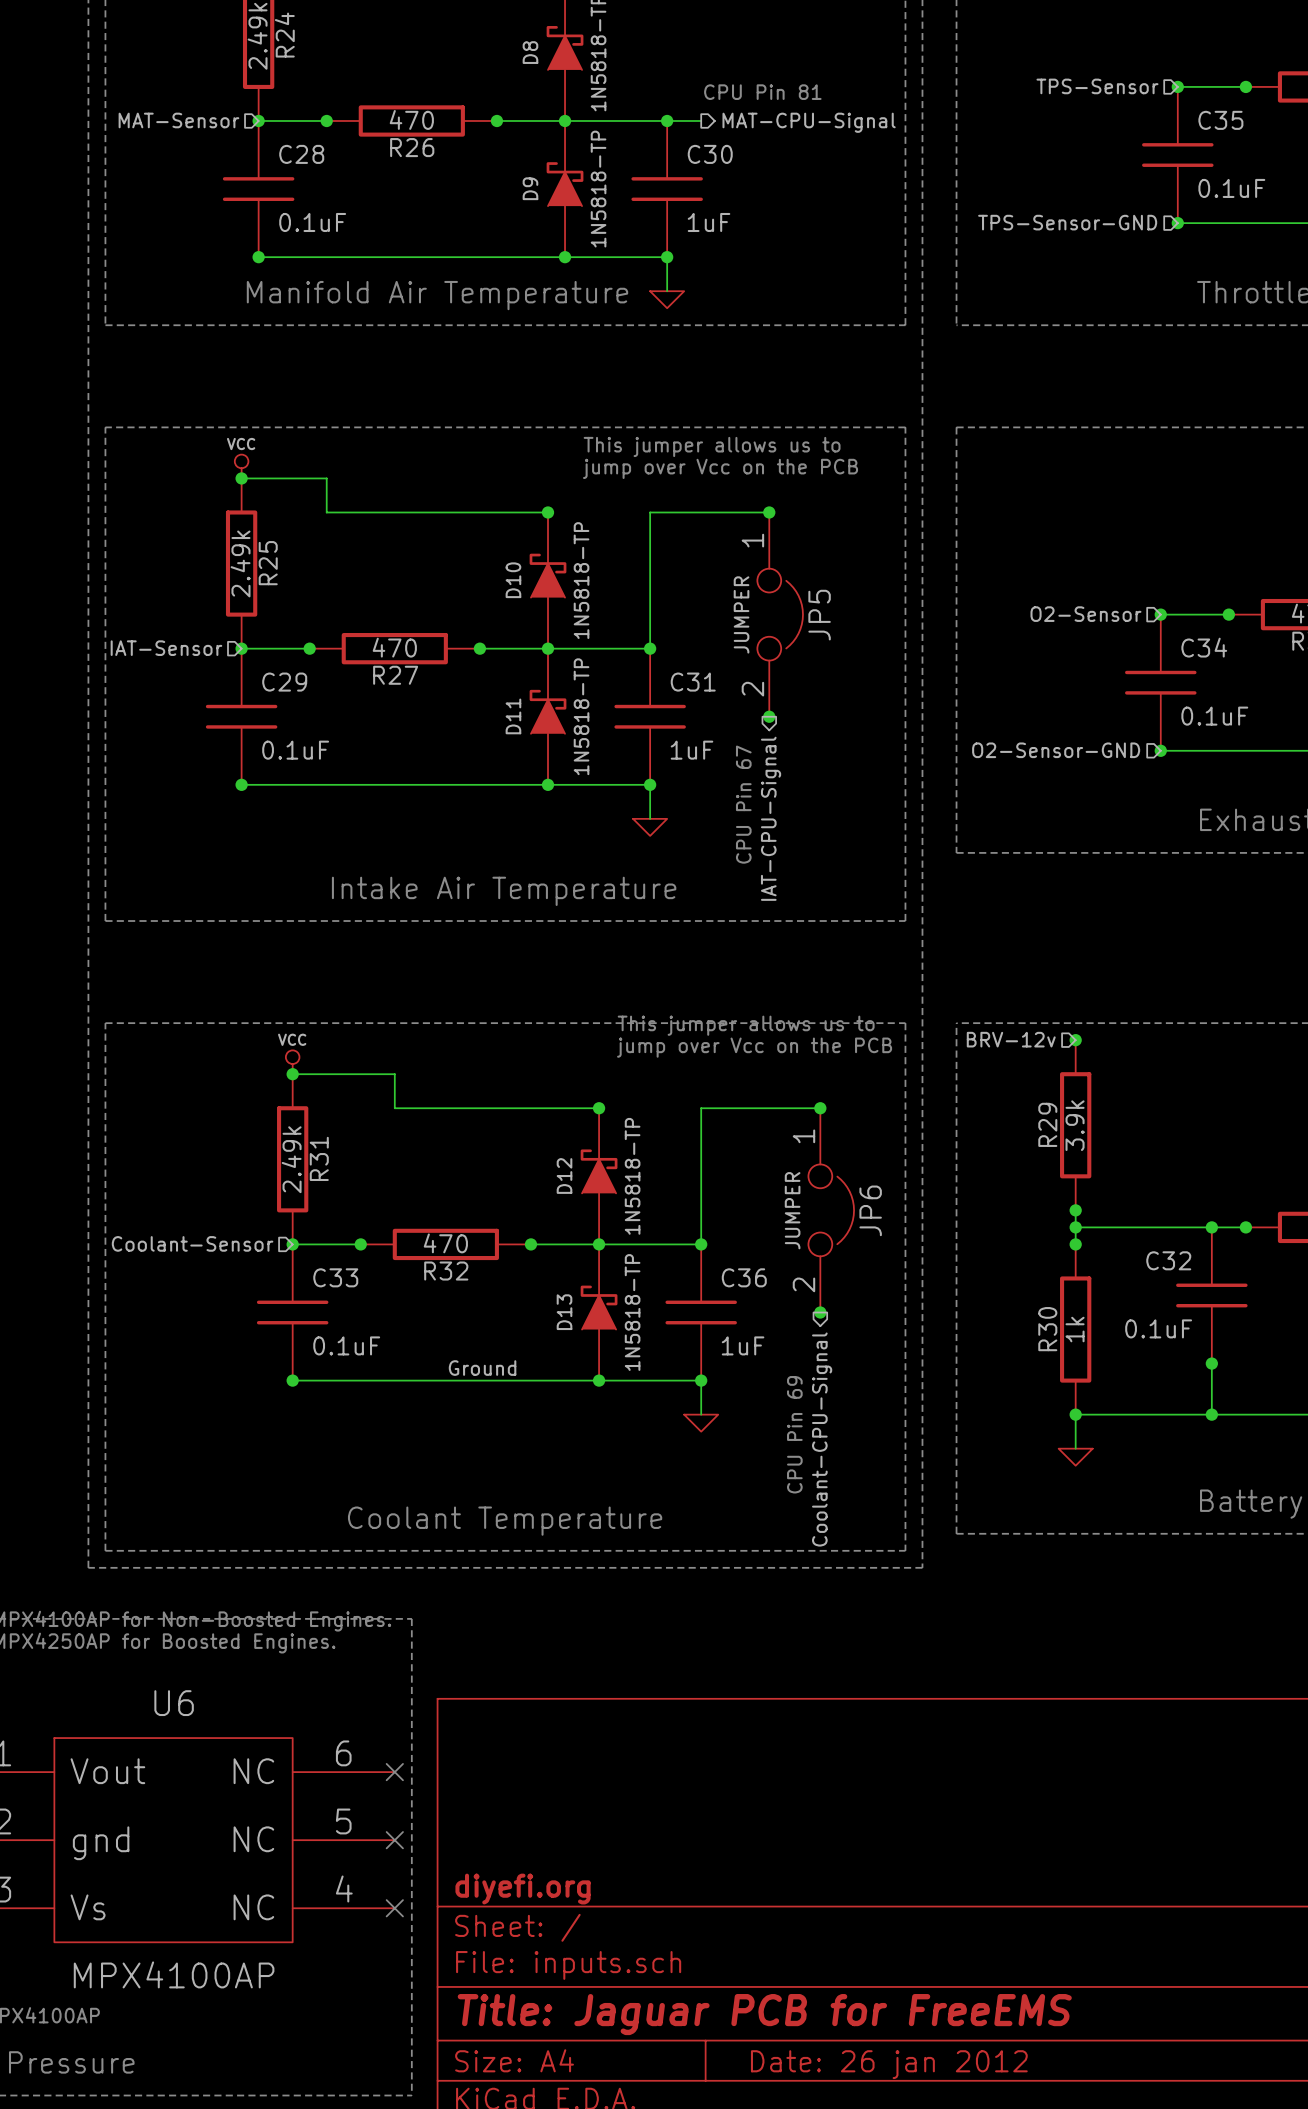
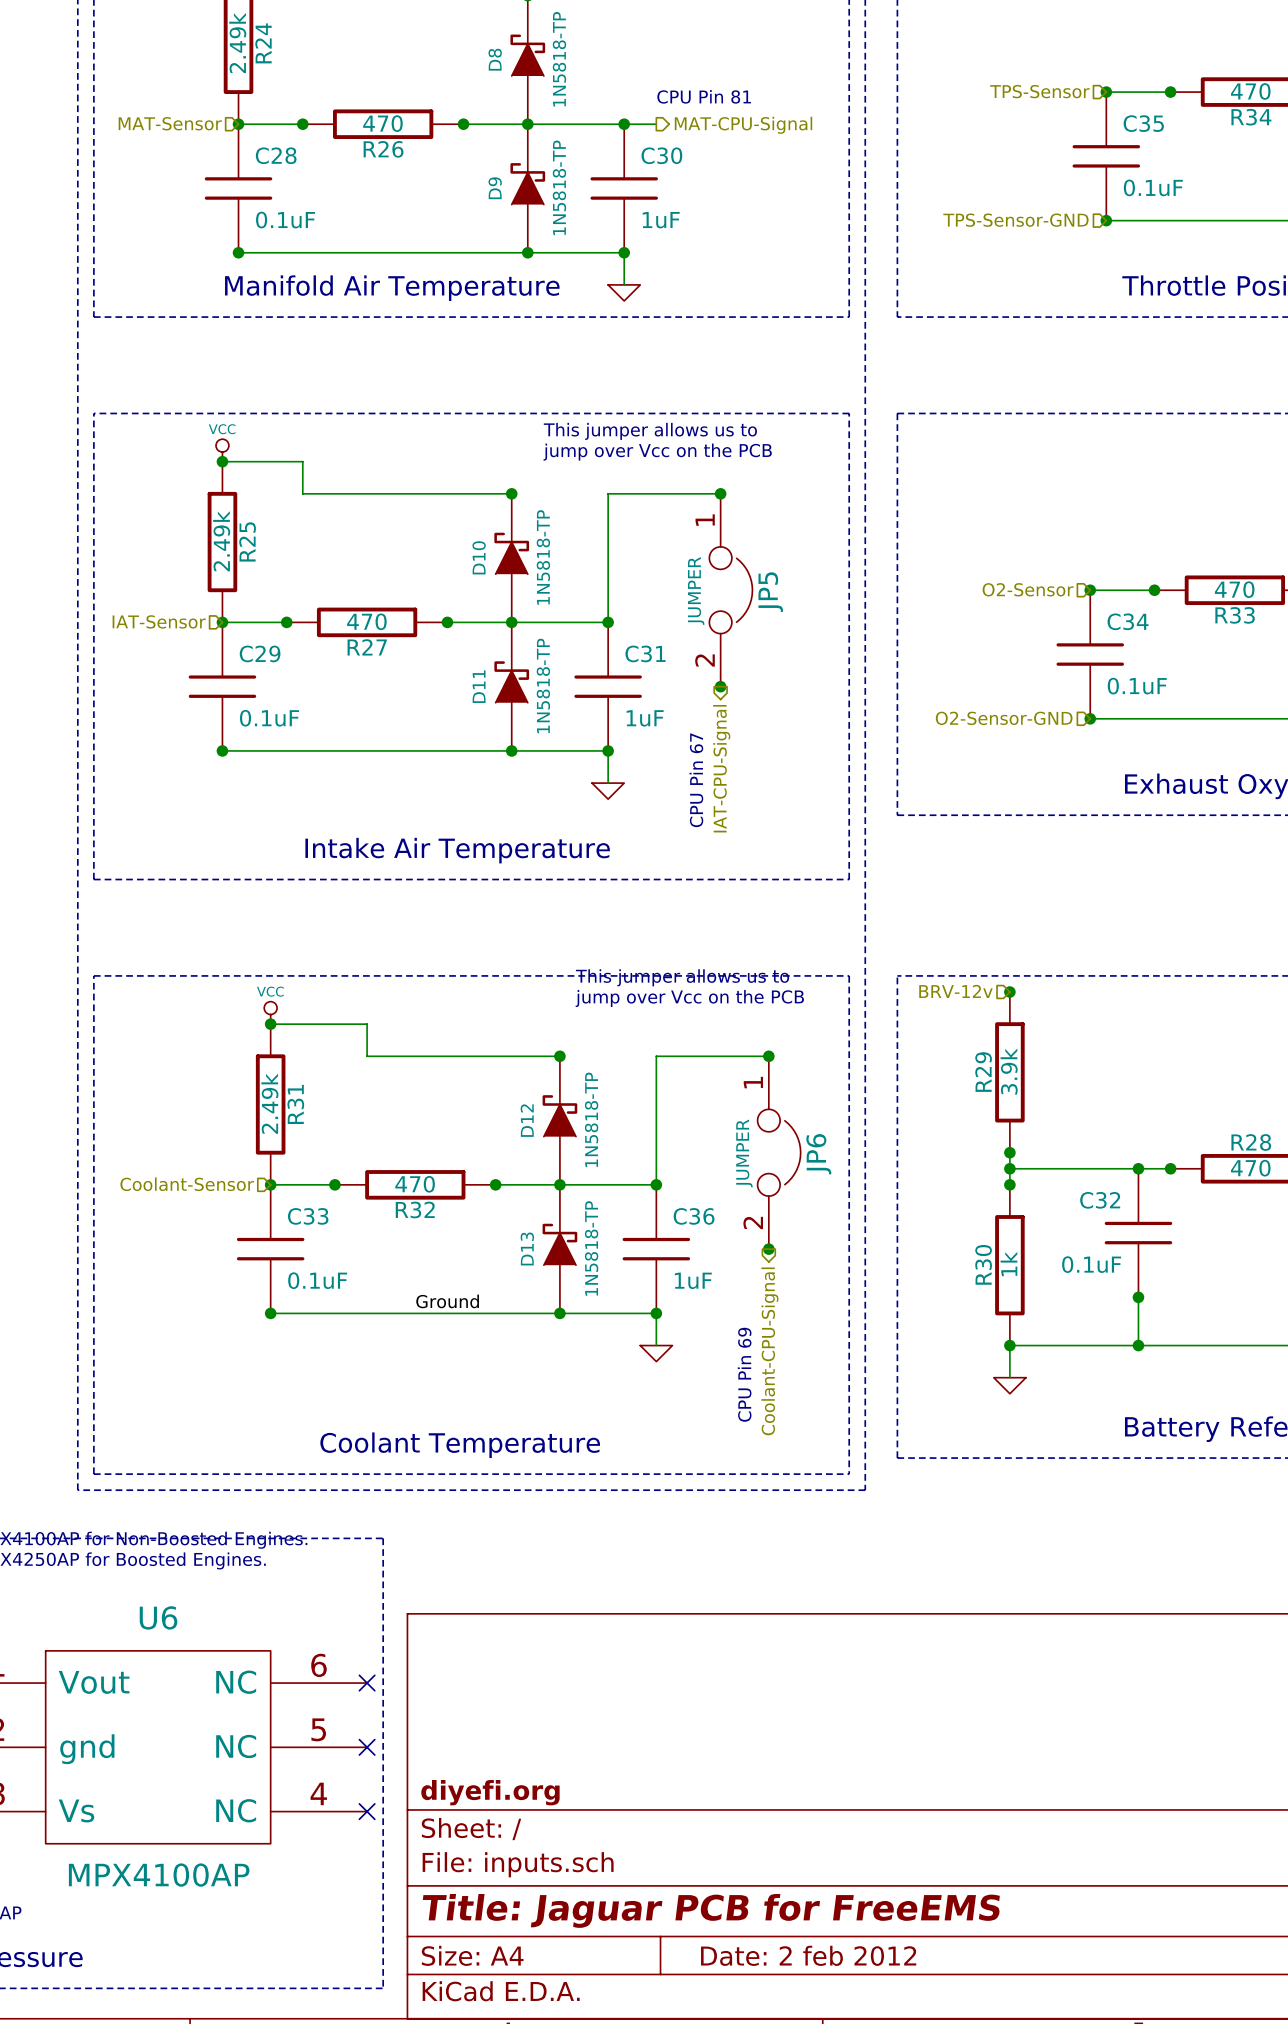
title block: Date: 26 jan 2012 (889, 2064) -> Date: 2 feb 2012 (808, 1955)

